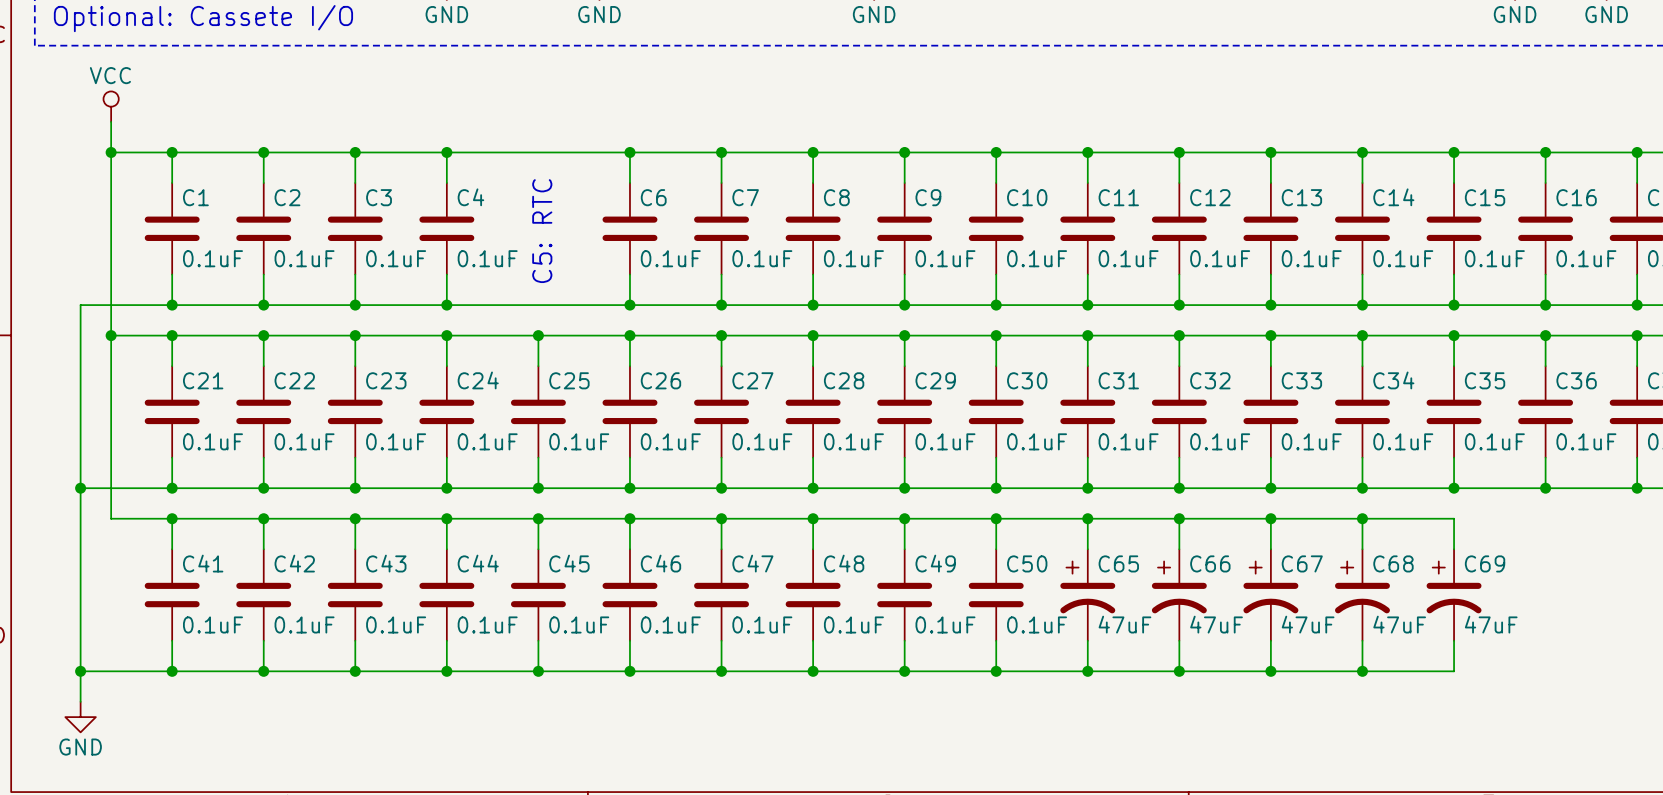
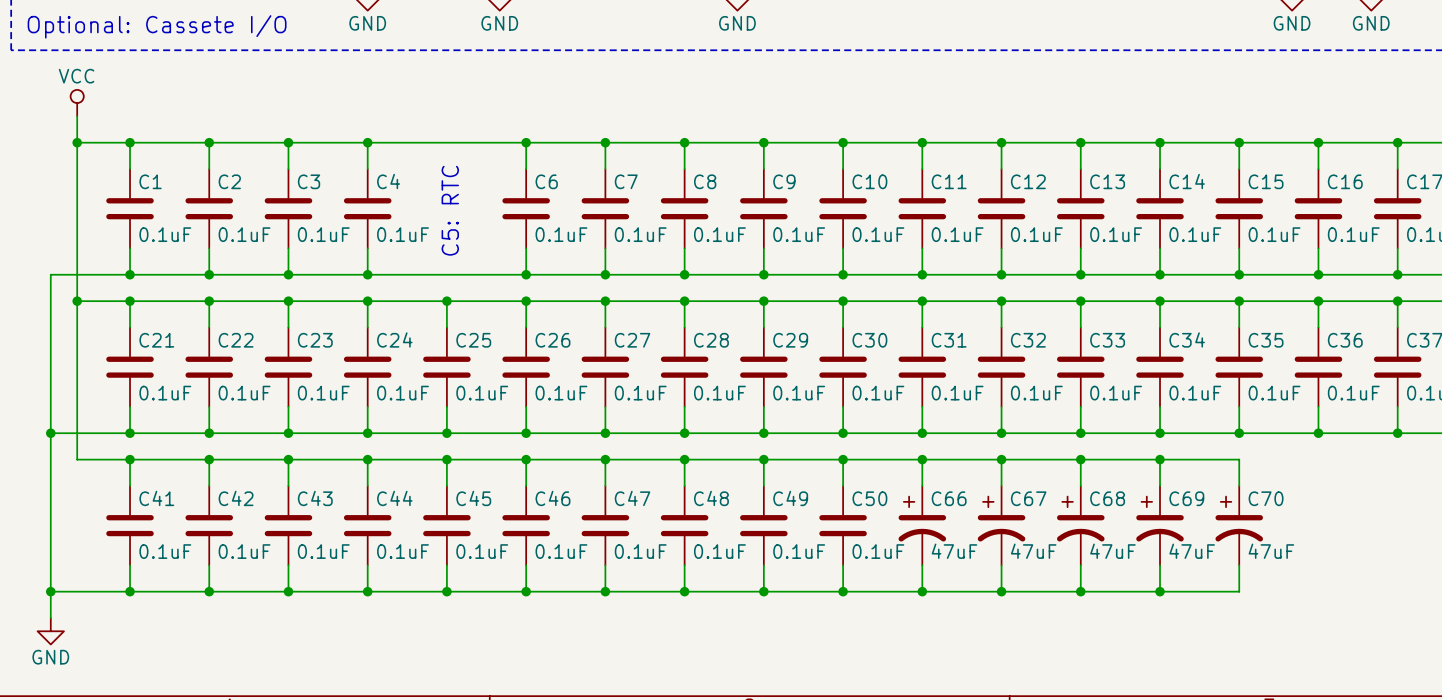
C65 name: C65 (1118, 563) -> C66 (949, 498)
C66 name: C66 (1210, 563) -> C67 (1028, 498)
C67 name: C67 (1302, 563) -> C68 (1107, 498)
C68 name: C68 (1393, 563) -> C69 (1186, 498)
C69 name: C69 (1485, 563) -> C70 (1266, 498)

